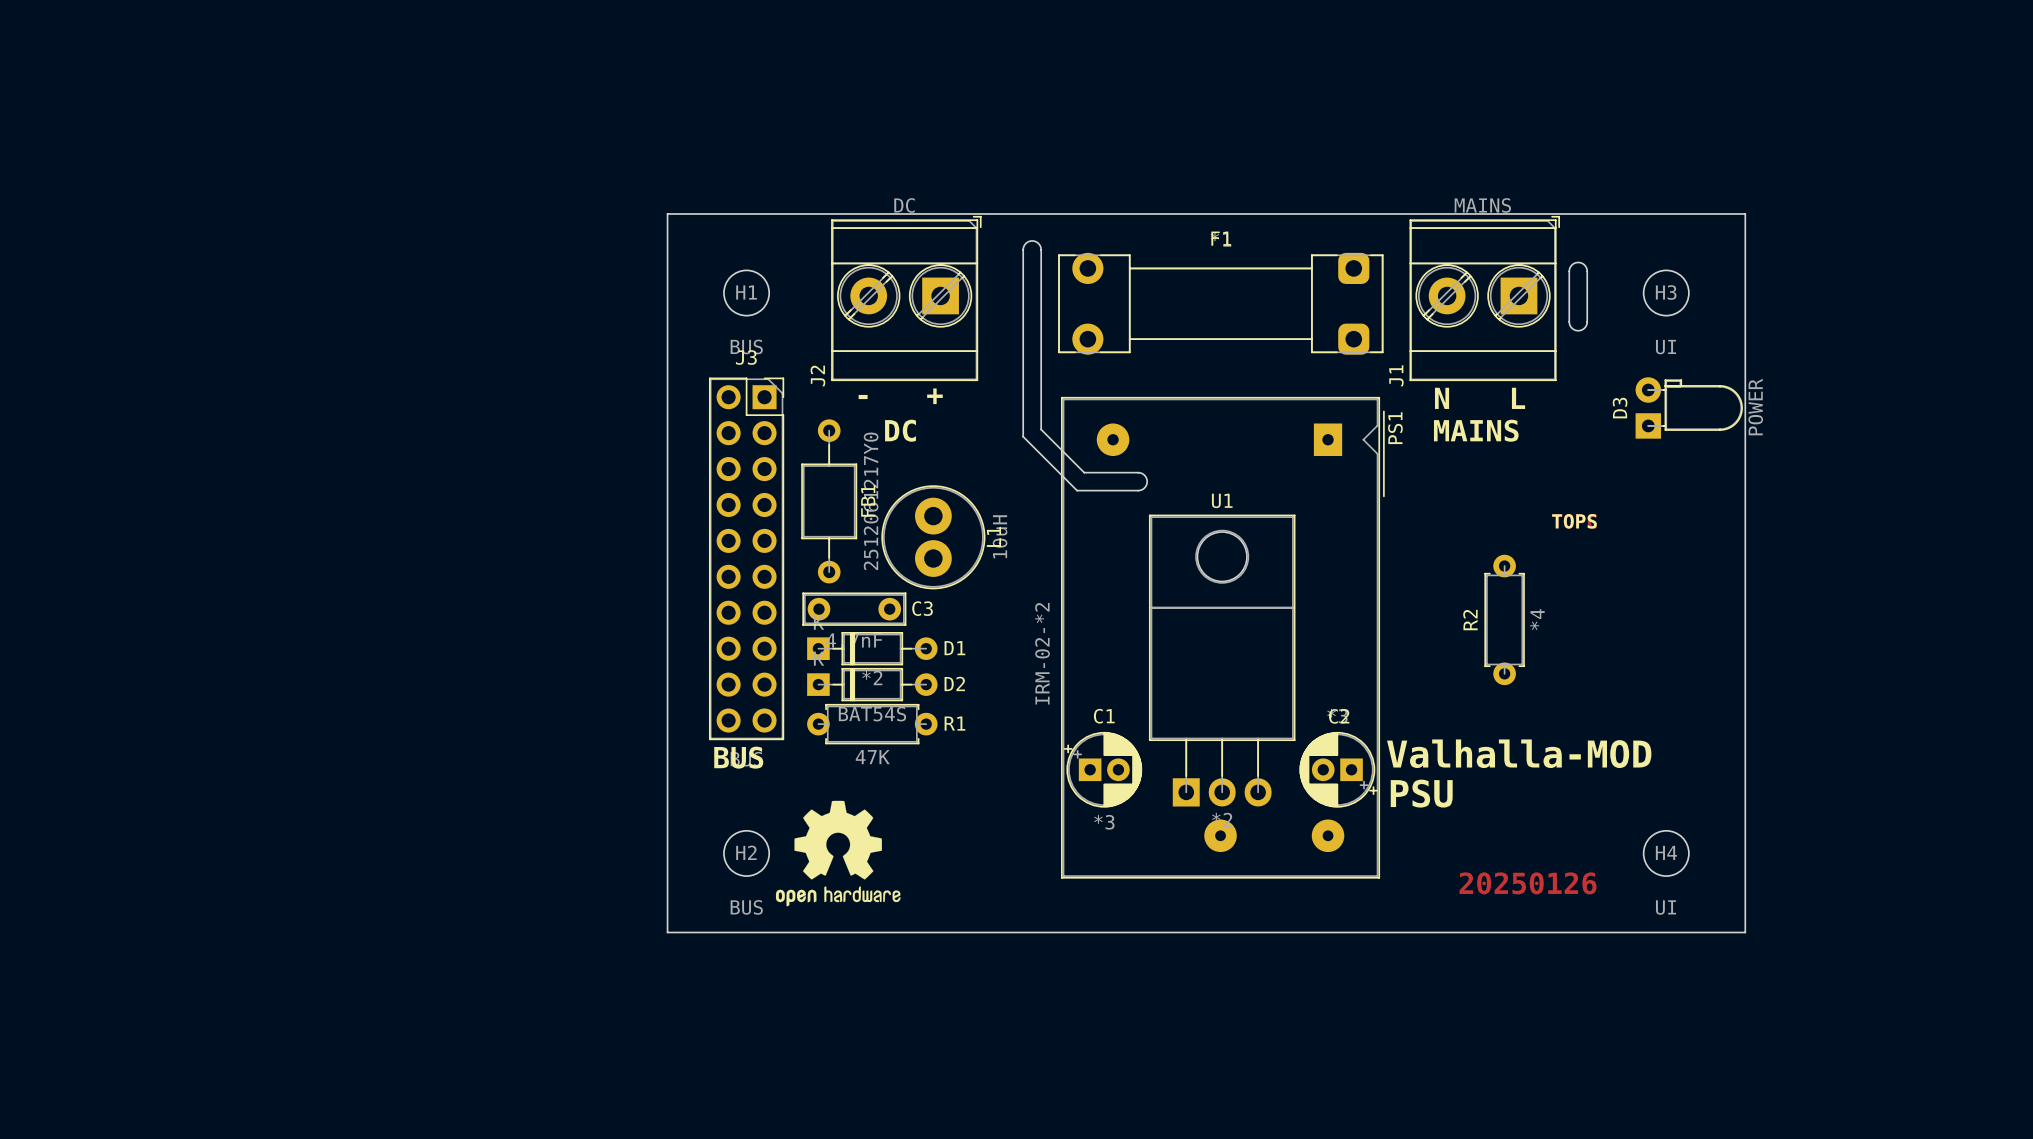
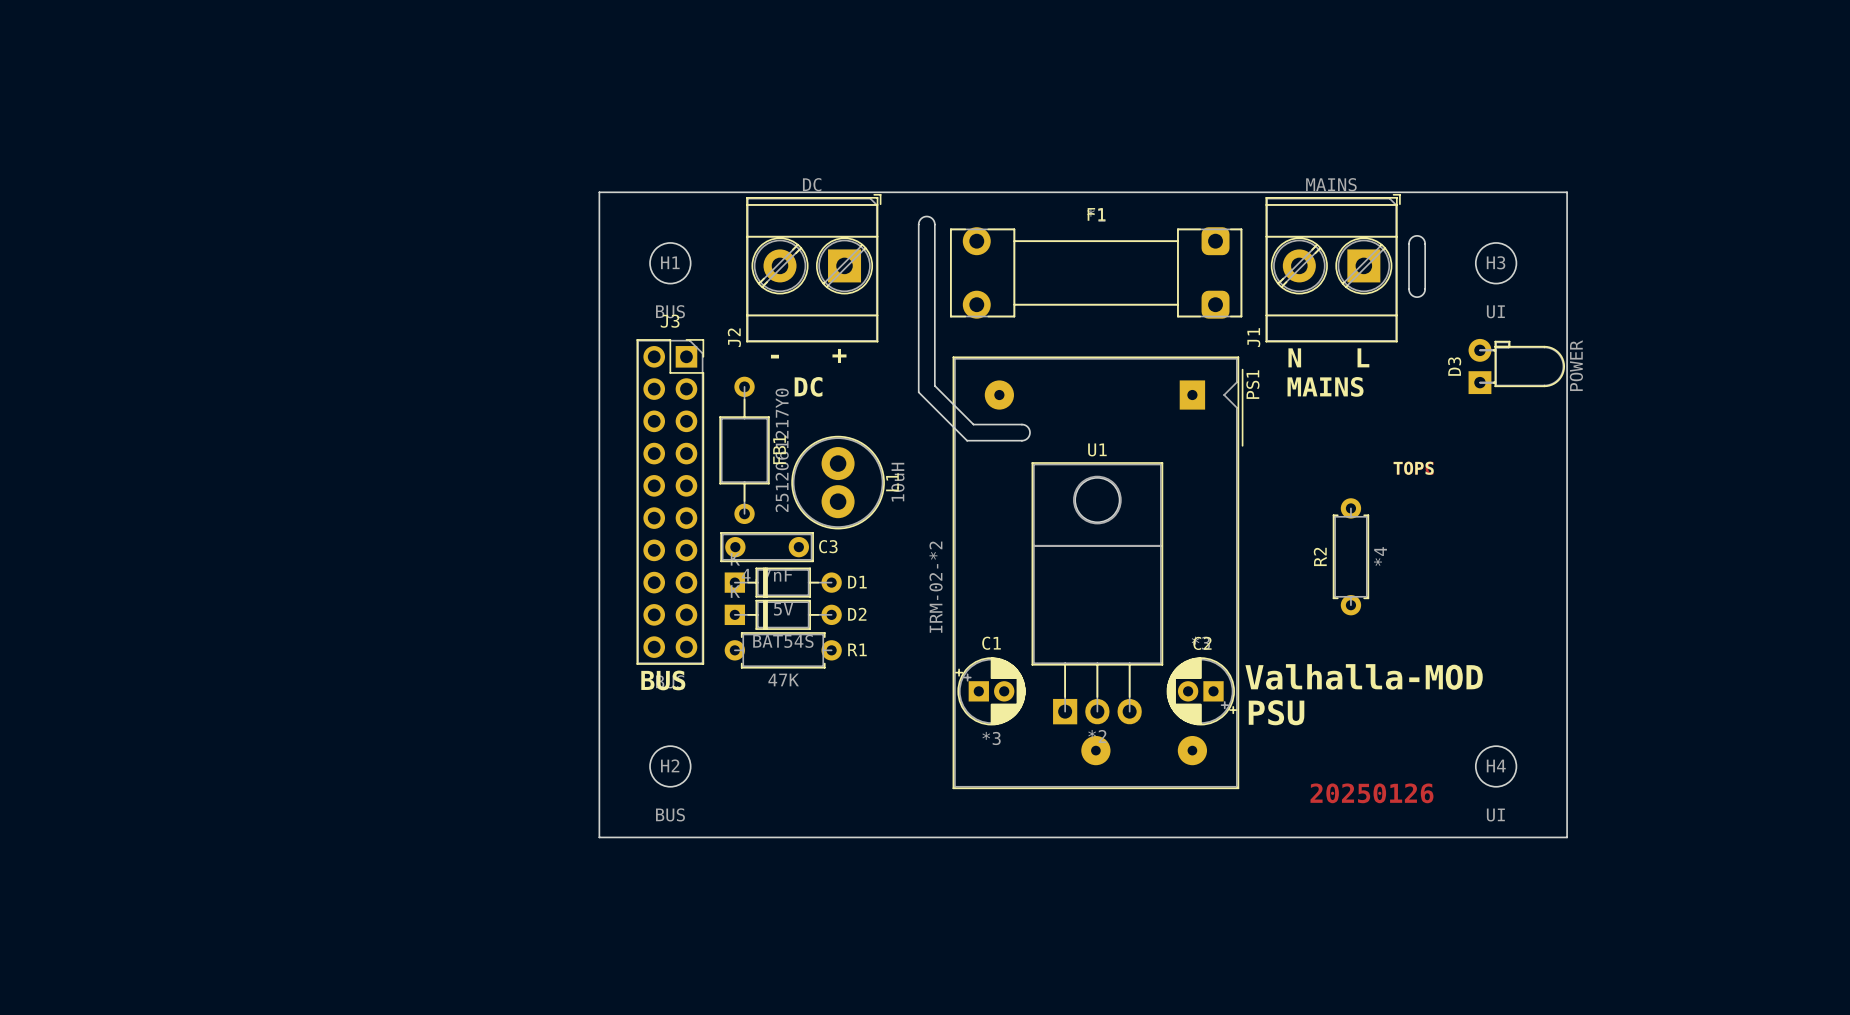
D1 value: *2 (872, 678) -> 5V (783, 609)
drawing: [775, 800, 901, 907] -> none

